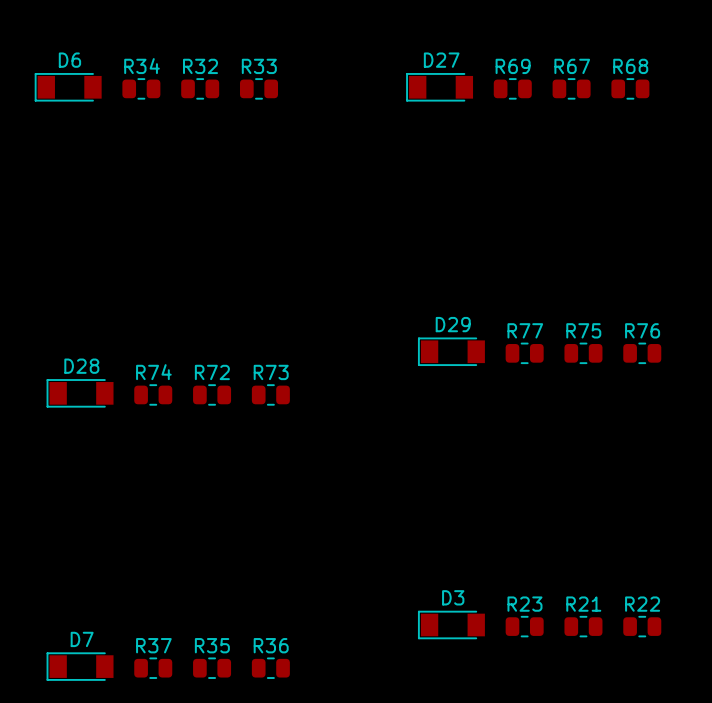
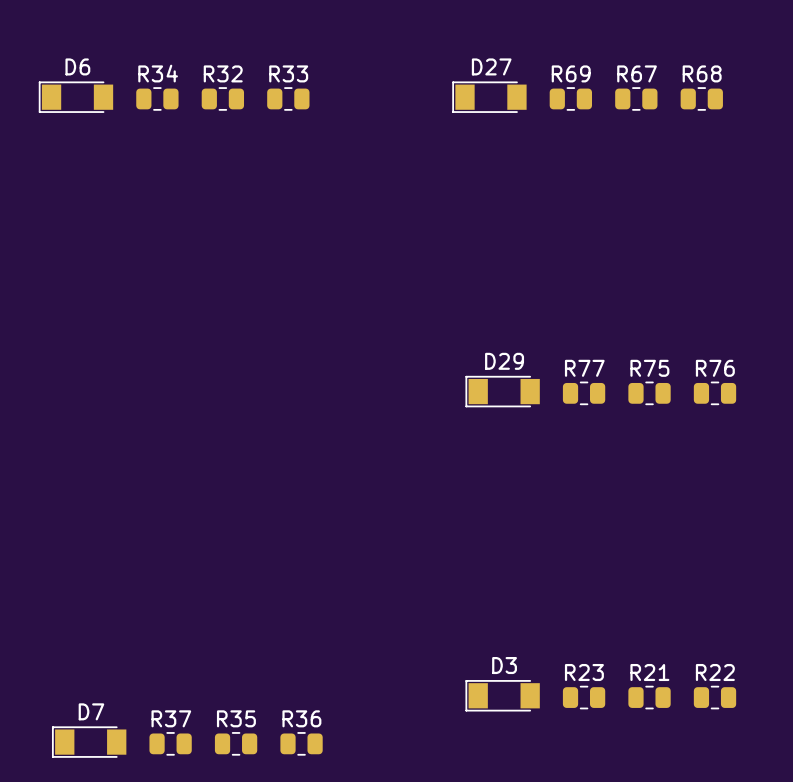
D28: (80, 393) -> none
R74: (153, 394) -> none
R72: (212, 394) -> none
R73: (270, 394) -> none

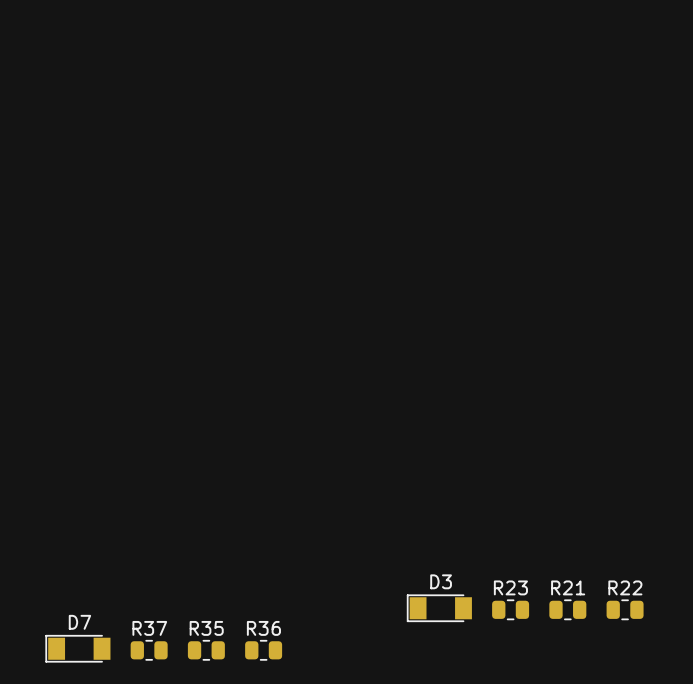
D6: (75, 97) -> none
D27: (489, 97) -> none
R34: (157, 98) -> none
R32: (222, 98) -> none
R33: (288, 98) -> none
R69: (570, 98) -> none
R67: (636, 98) -> none
R68: (701, 98) -> none
D29: (502, 391) -> none
R77: (584, 393) -> none
R75: (649, 393) -> none
R76: (715, 393) -> none

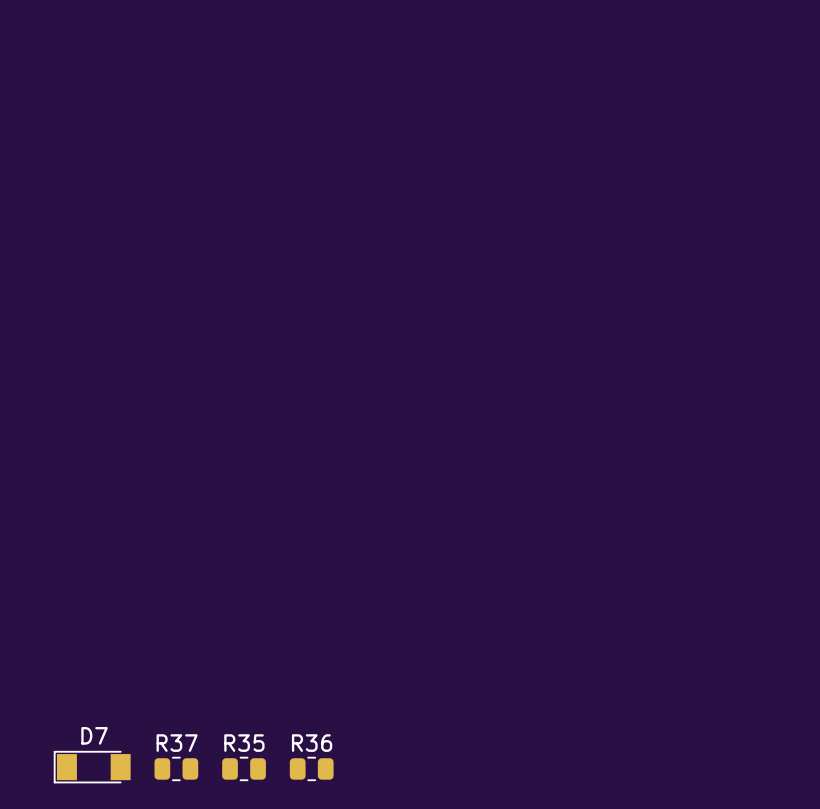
D3: (439, 608) -> none
R23: (510, 609) -> none
R21: (567, 609) -> none
R22: (625, 609) -> none

